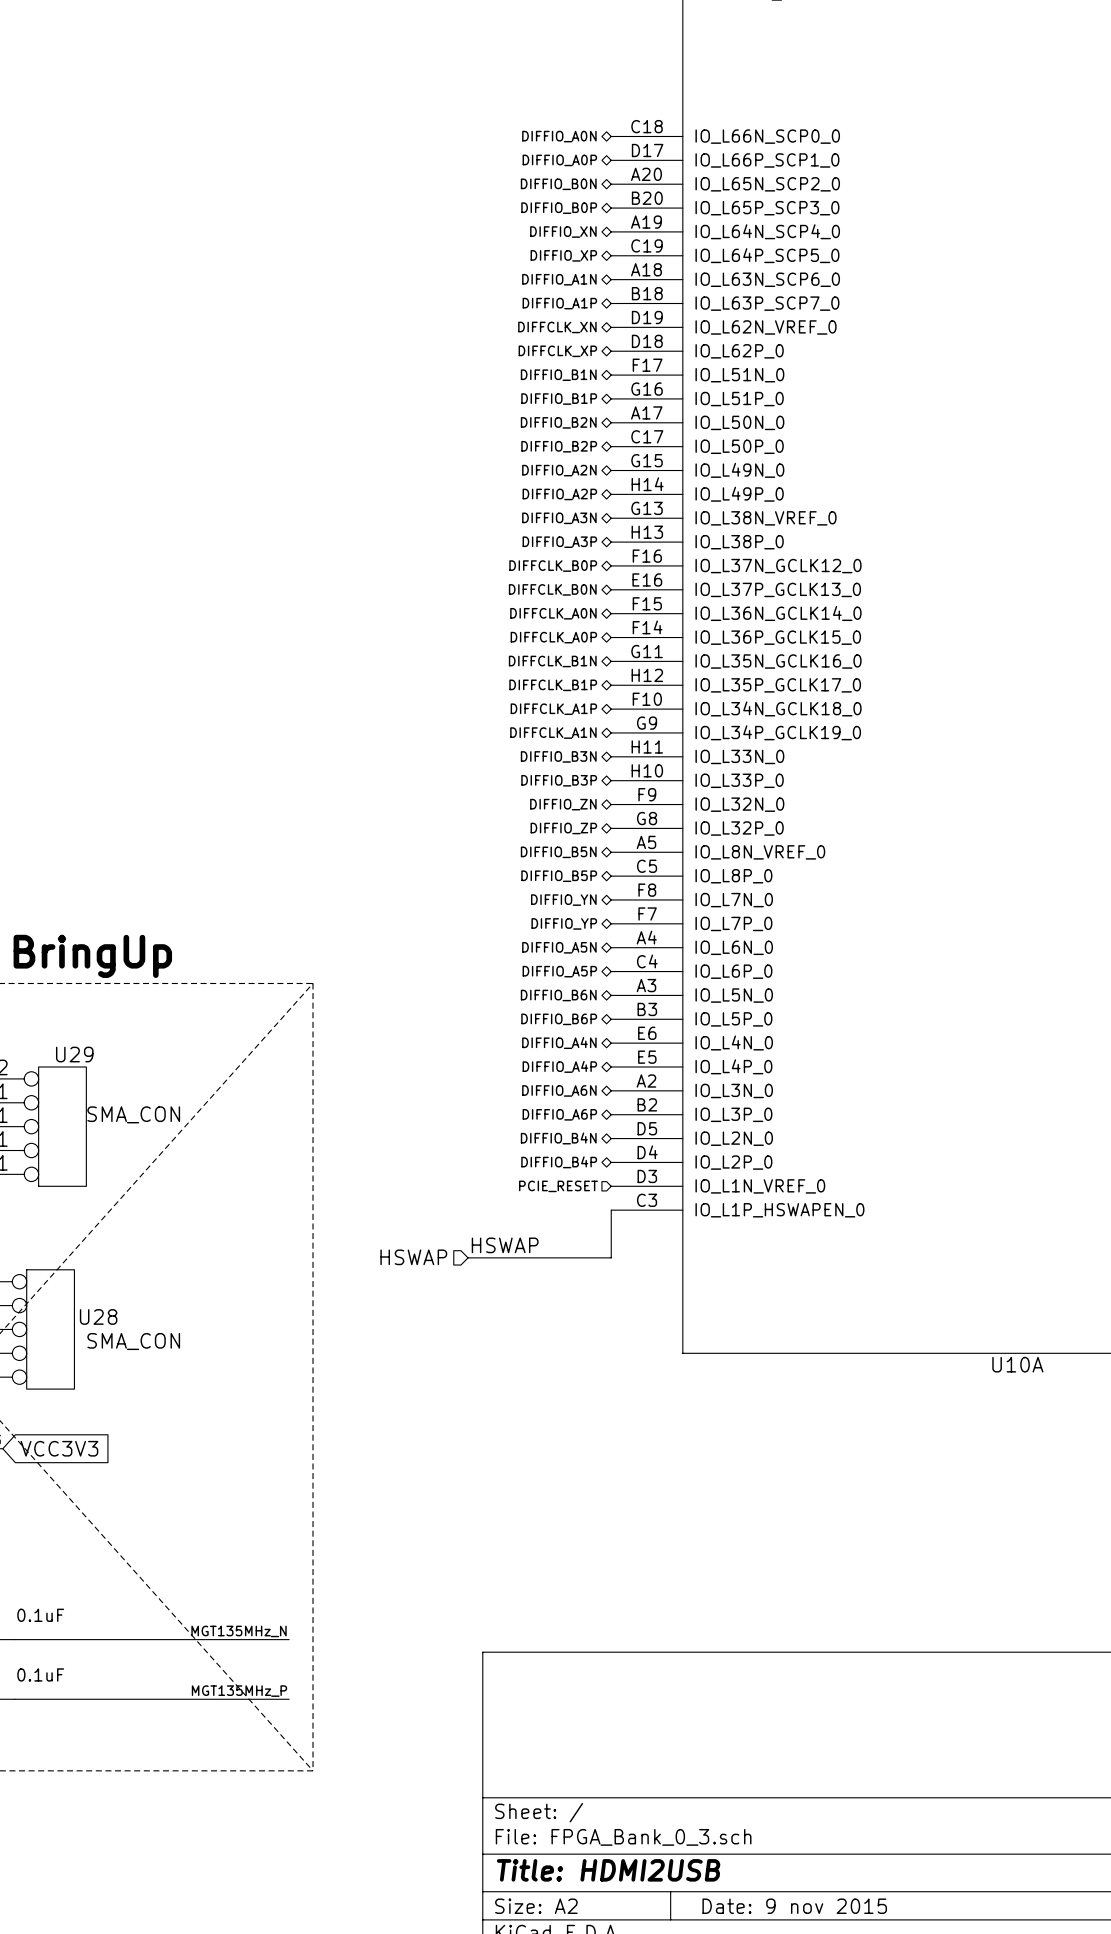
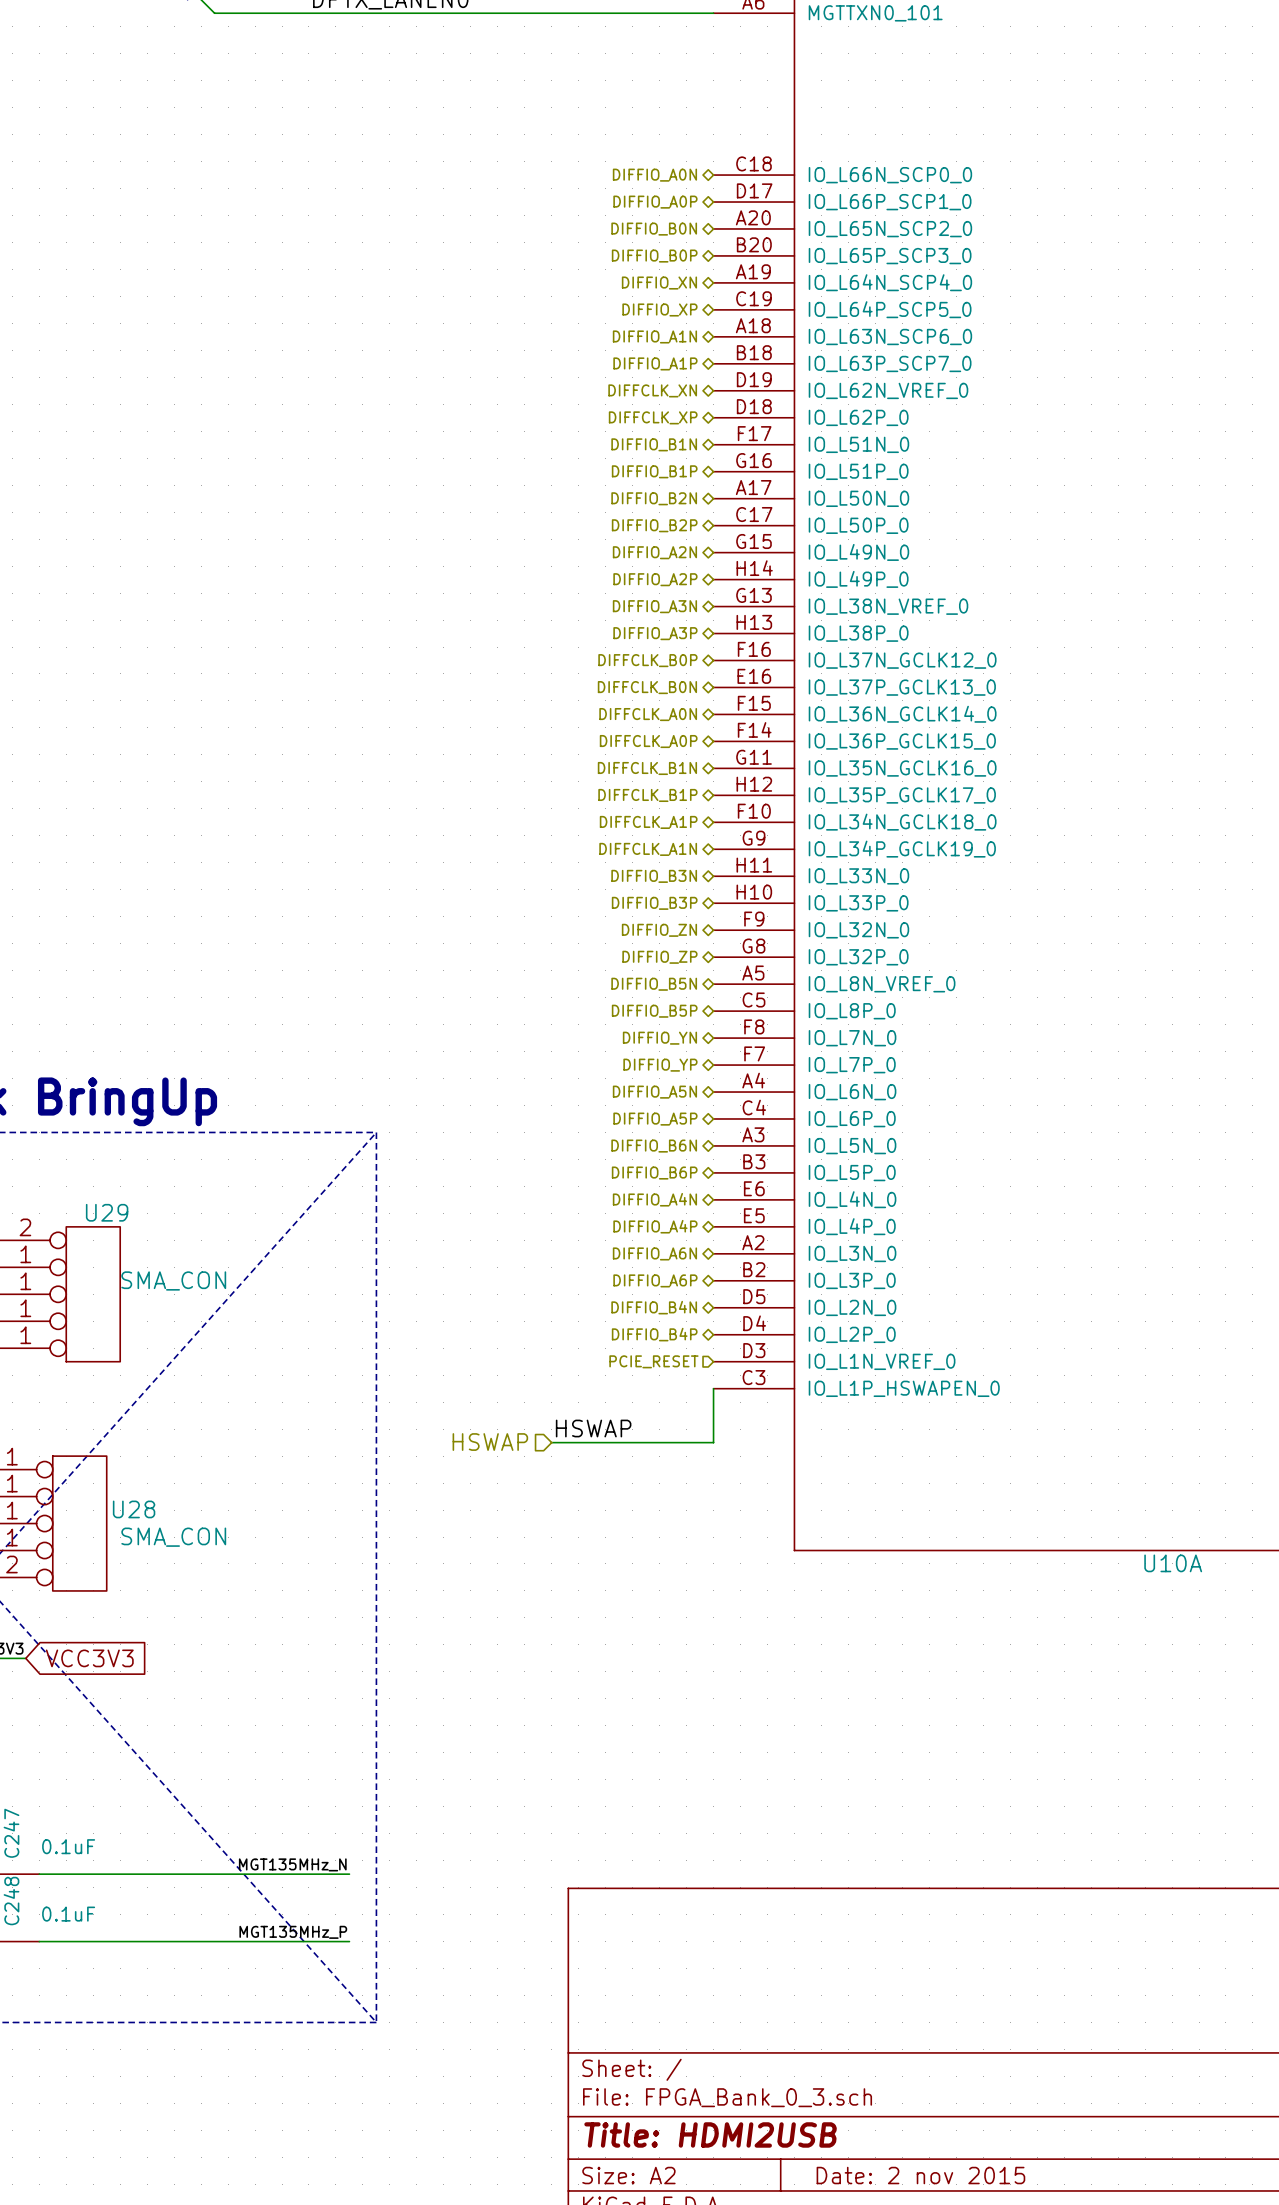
title block: Date: 9 nov 2015 (794, 1906) -> Date: 2 nov 2015 (920, 2175)

